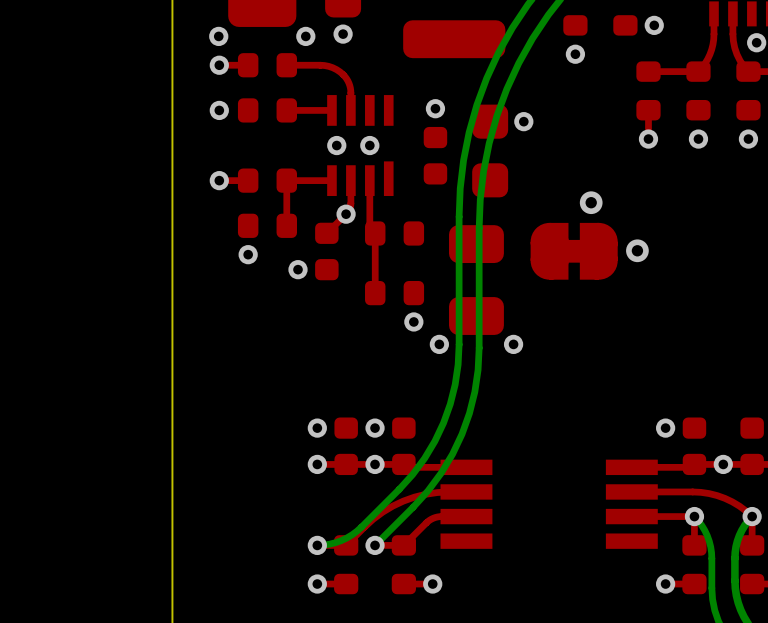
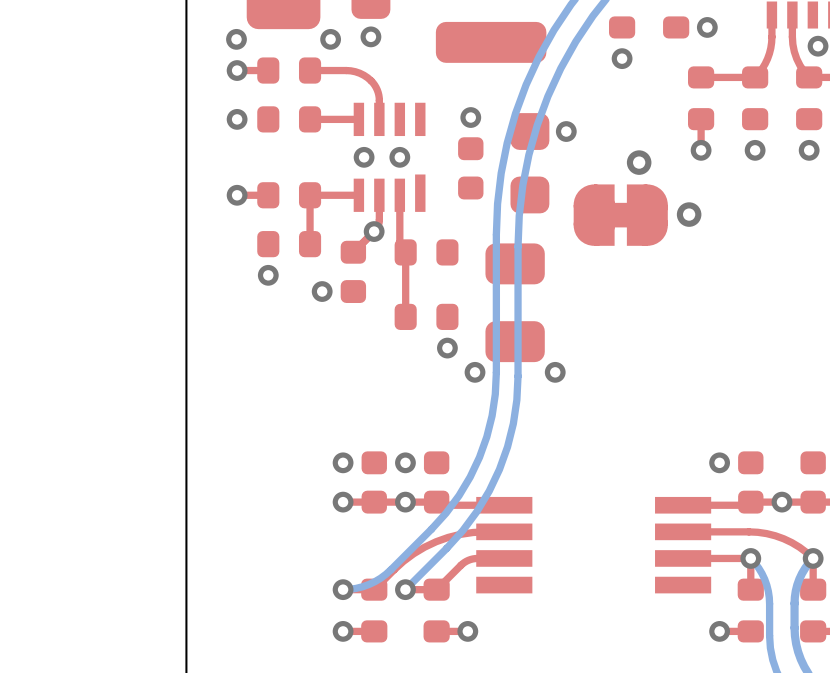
via: none -> (639, 162)
via: none -> (689, 214)
via: (591, 202) -> none
via: (637, 250) -> none
part position: (574, 251) -> (620, 215)

